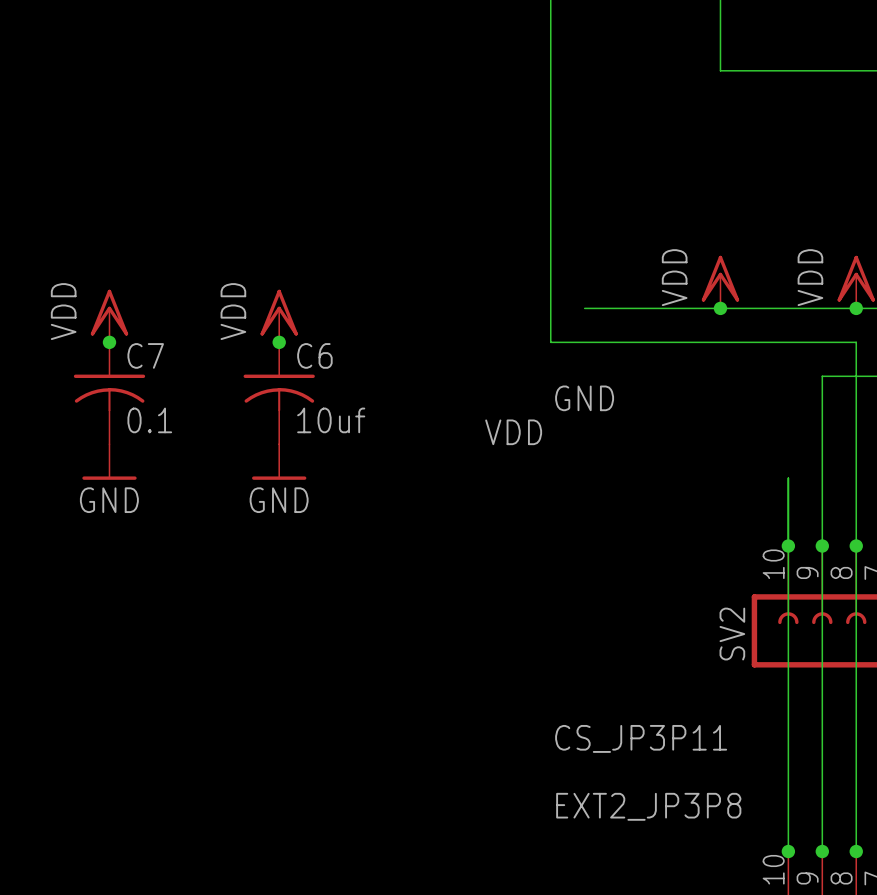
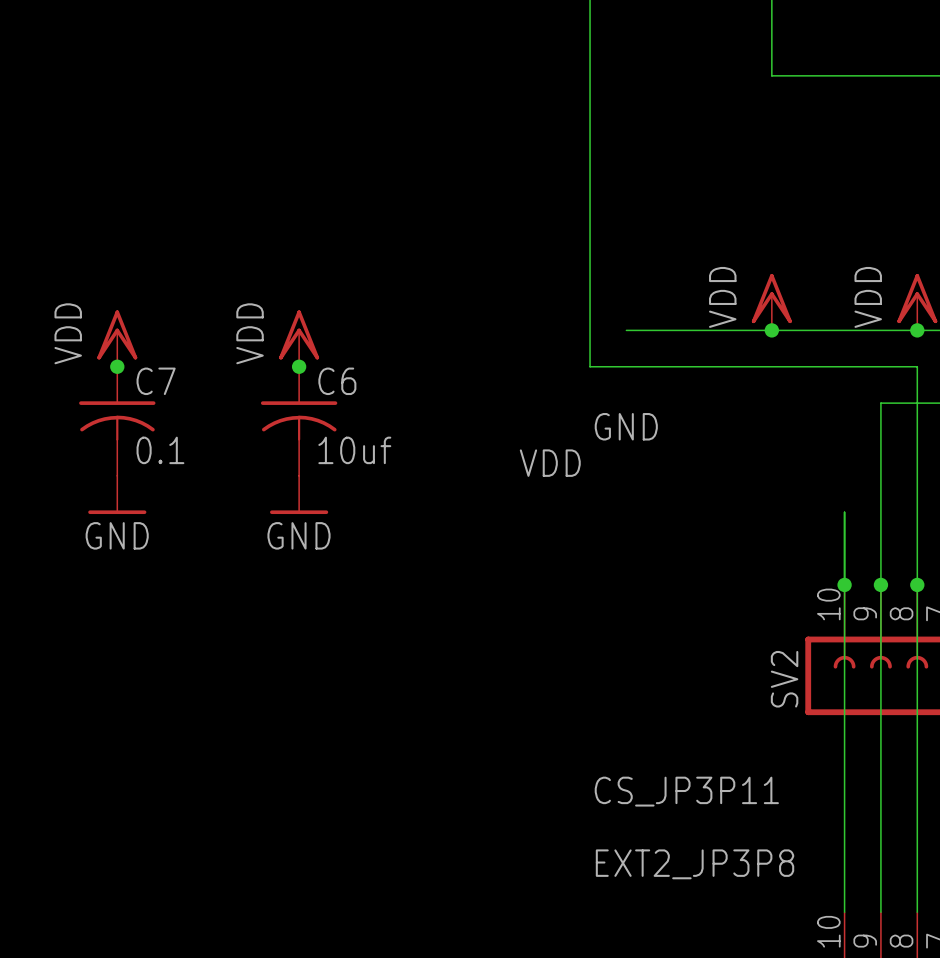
junction: (788, 851) -> none
junction: (822, 851) -> none
junction: (856, 851) -> none

